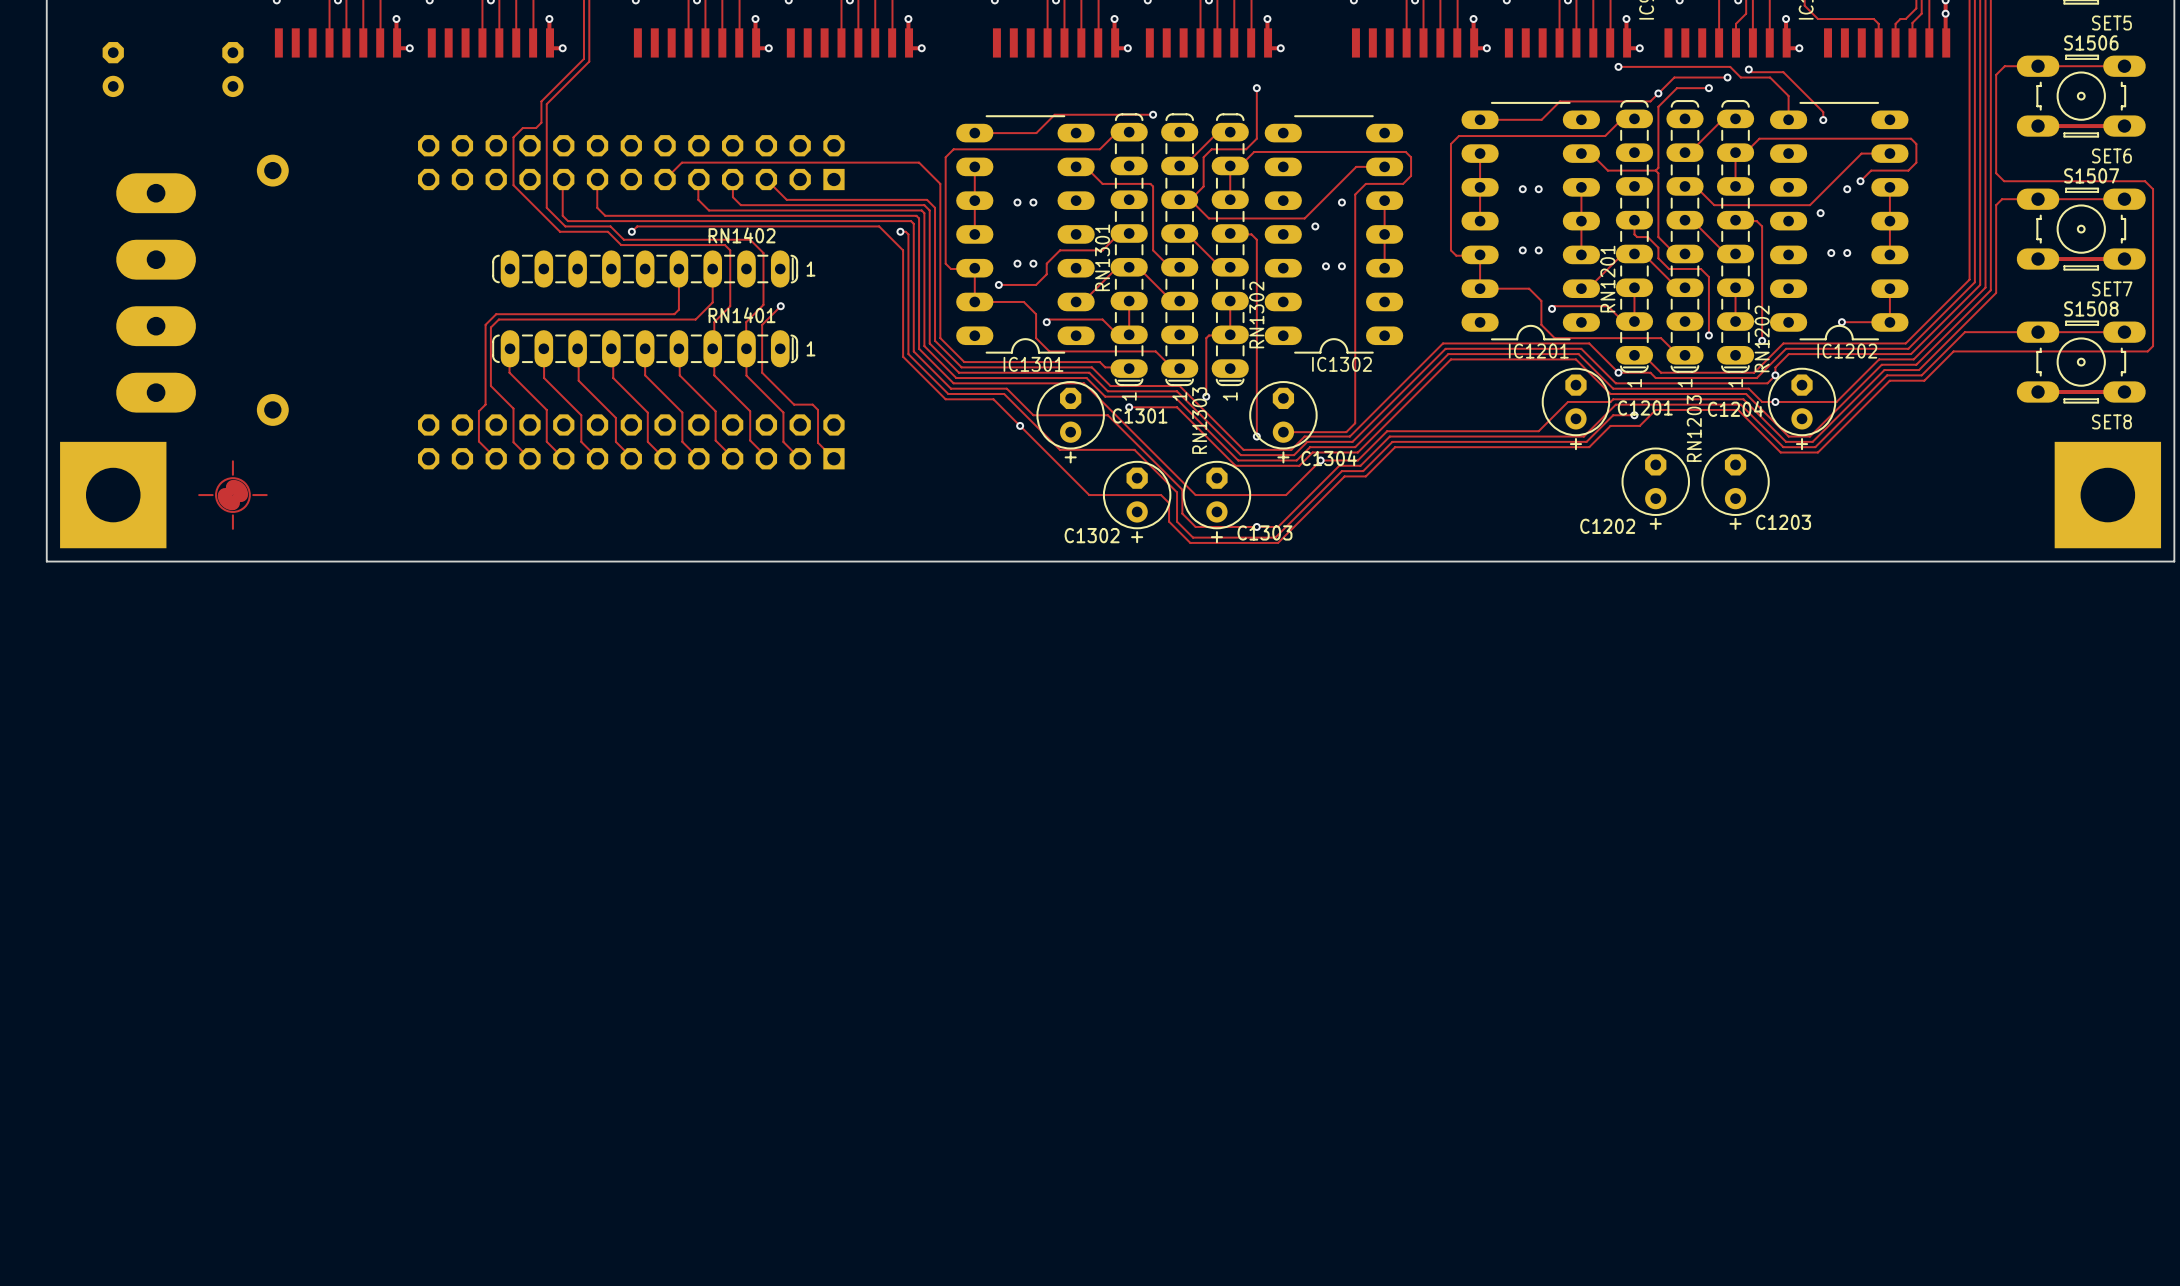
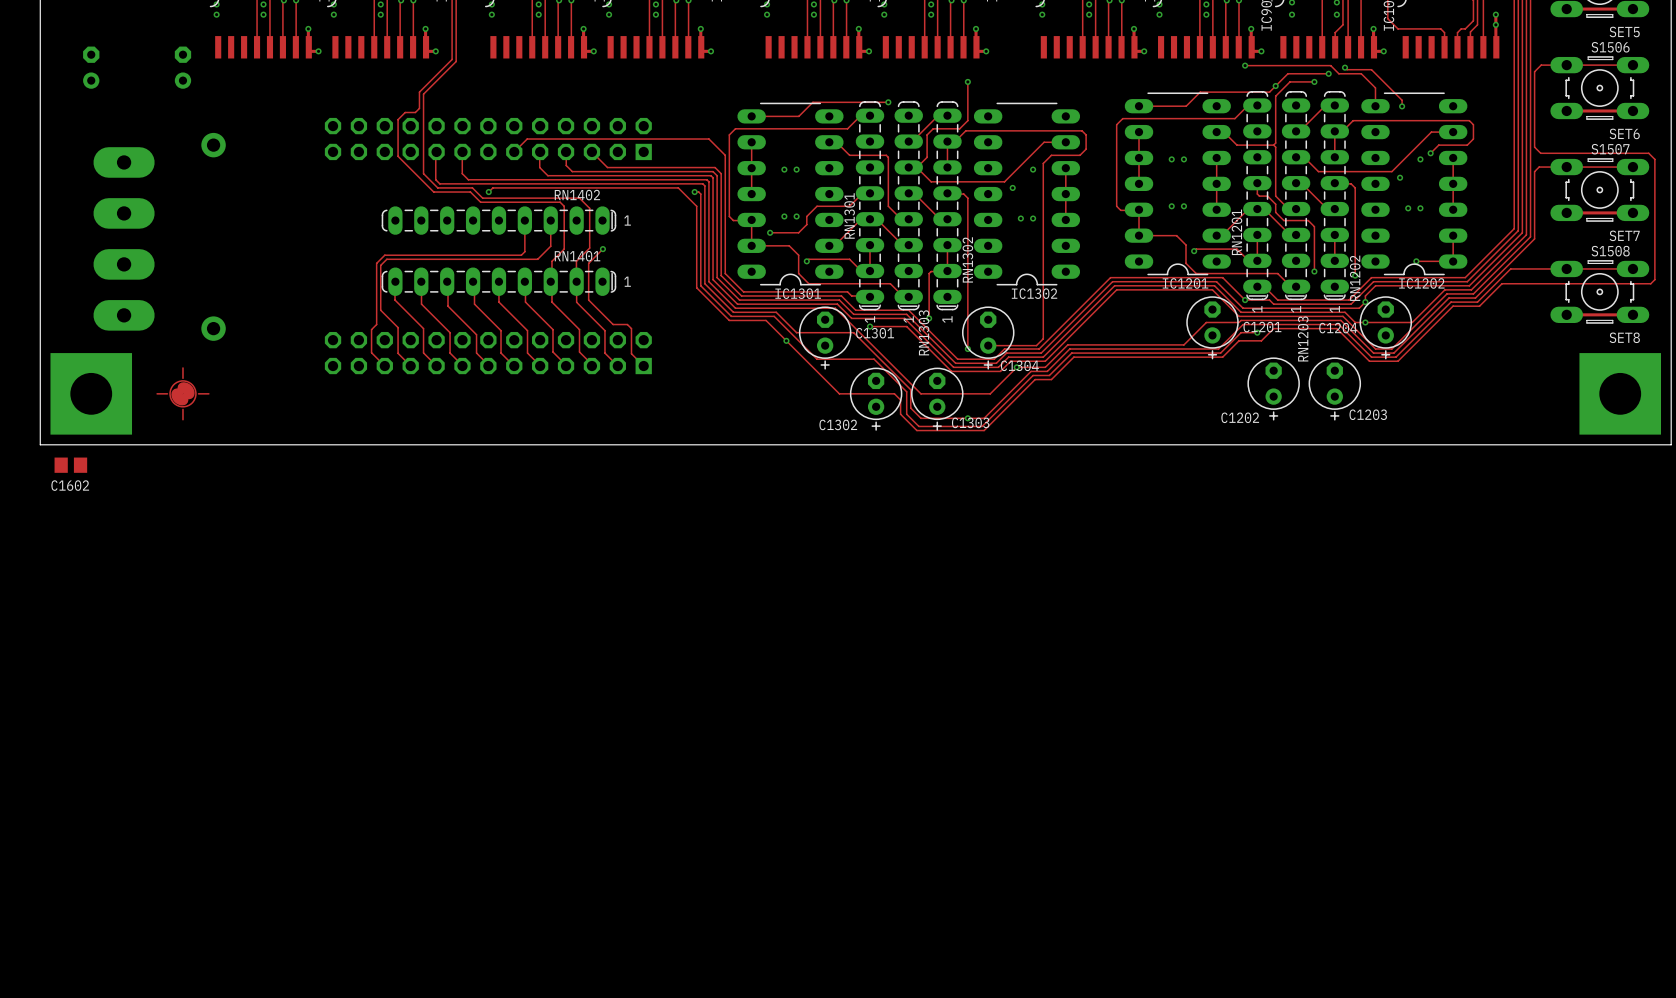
C1602: none -> (70, 465)

